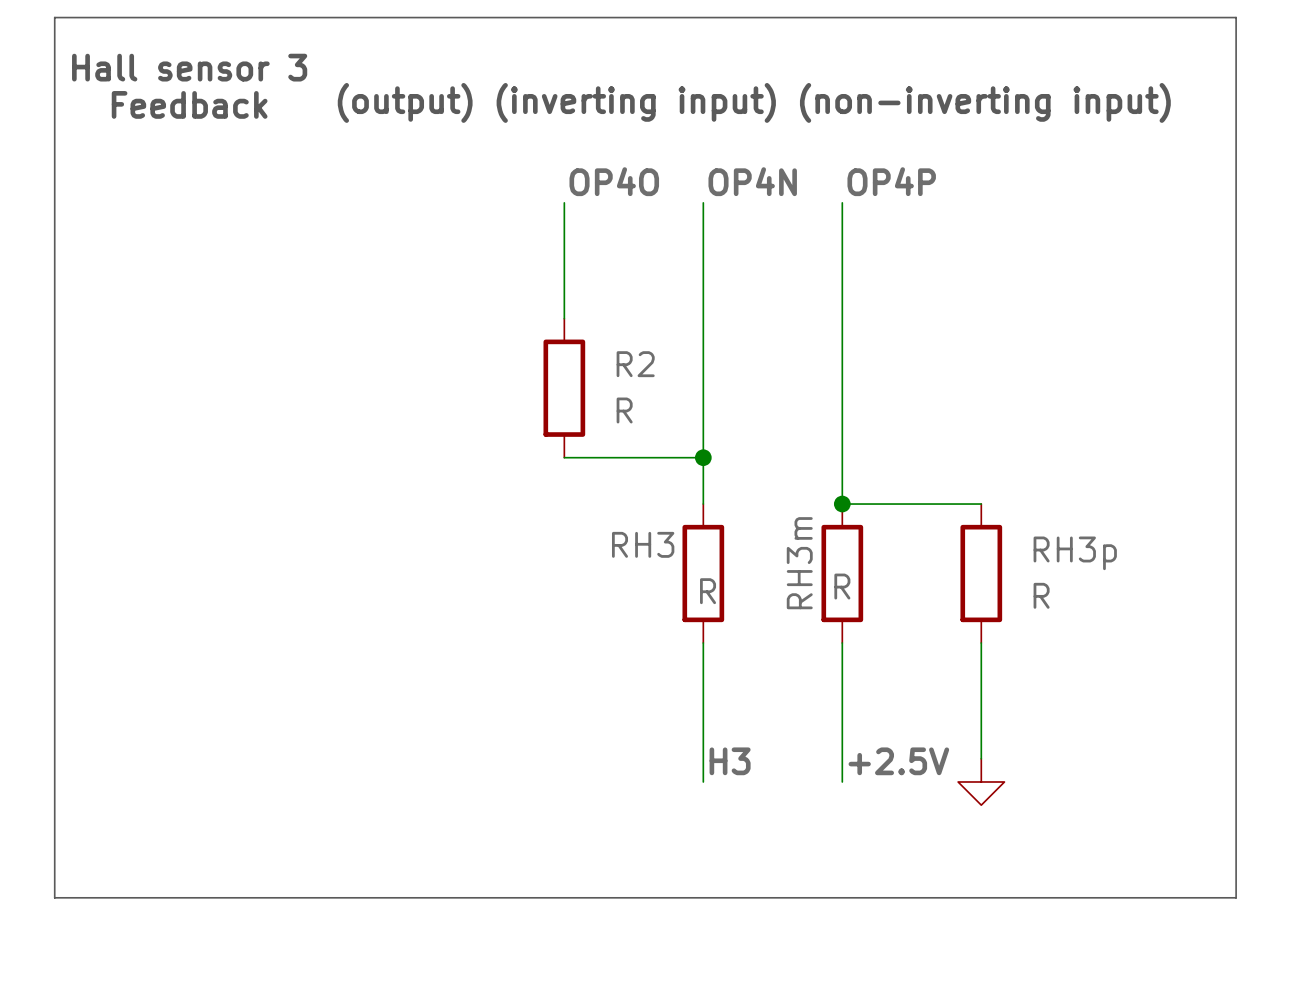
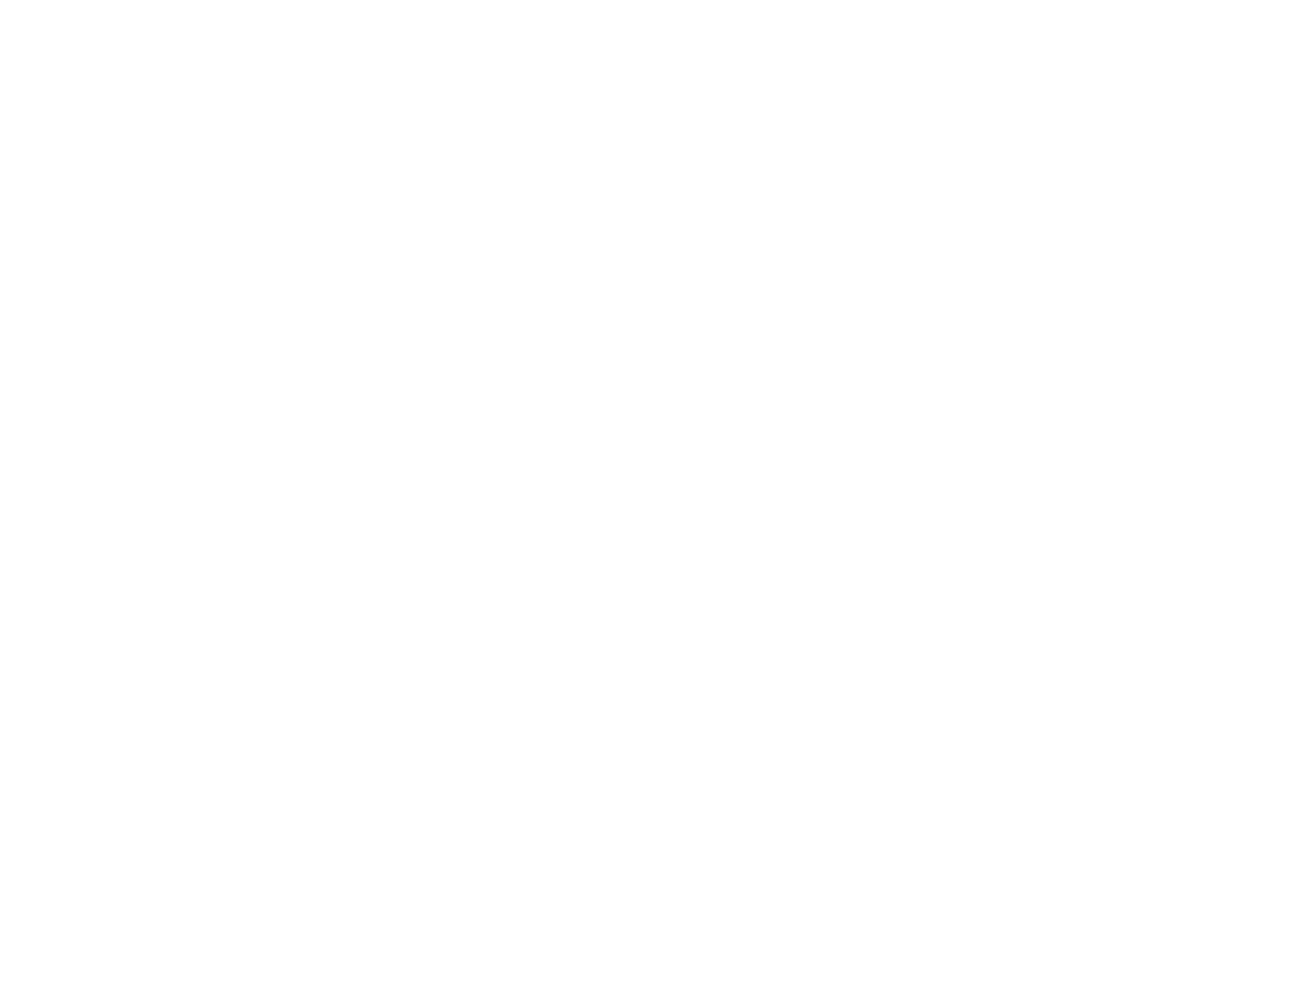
line: (54, 17) (54, 897) (1236, 897) (1236, 17) (54, 17) -> none
text: Hall sensor 3 (189, 67) -> none
text: (output) (inverting input) (non-inverting input) (754, 102) -> none
text: Feedback (189, 104) -> none
label: OP4O (614, 181) -> none
label: OP4N (752, 181) -> none
label: OP4P (891, 181) -> none
wire: (564, 202) (564, 318) -> none
wire: (703, 202) (703, 504) -> none
wire: (842, 202) (842, 504) (981, 504) -> none
R2: R (564, 388) -> none
wire: (564, 457) (703, 457) -> none
junction: (703, 457) -> none
junction: (842, 504) -> none
RH3: R (703, 573) -> none
RH3m: R (842, 573) -> none
RH3p: R (981, 573) -> none
wire: (703, 643) (703, 781) -> none
wire: (842, 643) (842, 781) -> none
wire: (981, 643) (981, 758) -> none
label: H3 (730, 761) -> none
label: +2.5V (898, 761) -> none
power symbol: (981, 781) -> none

